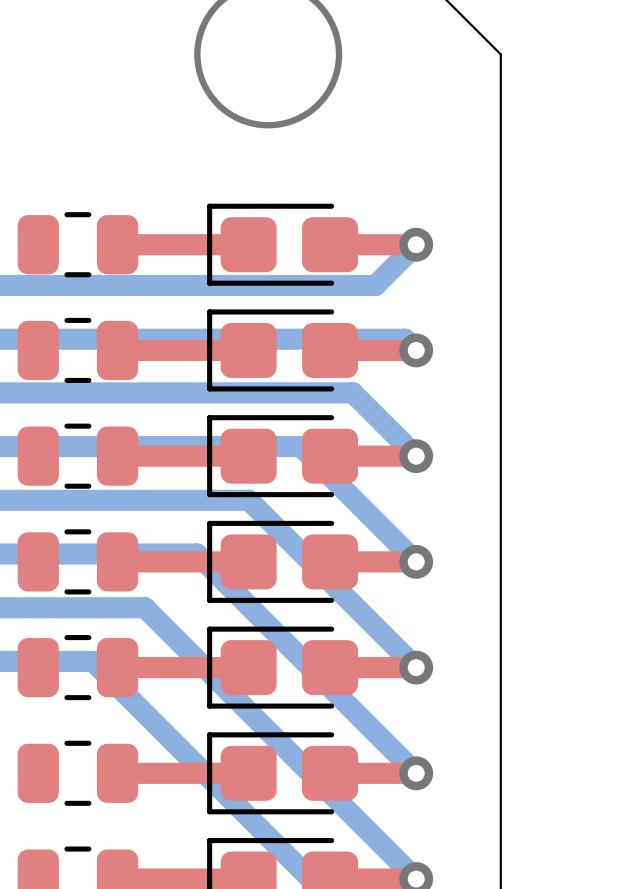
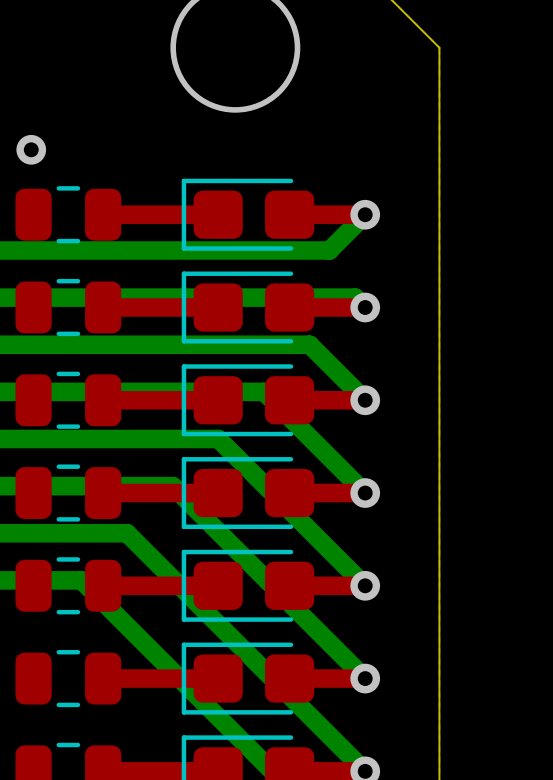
via: none -> (31, 149)

